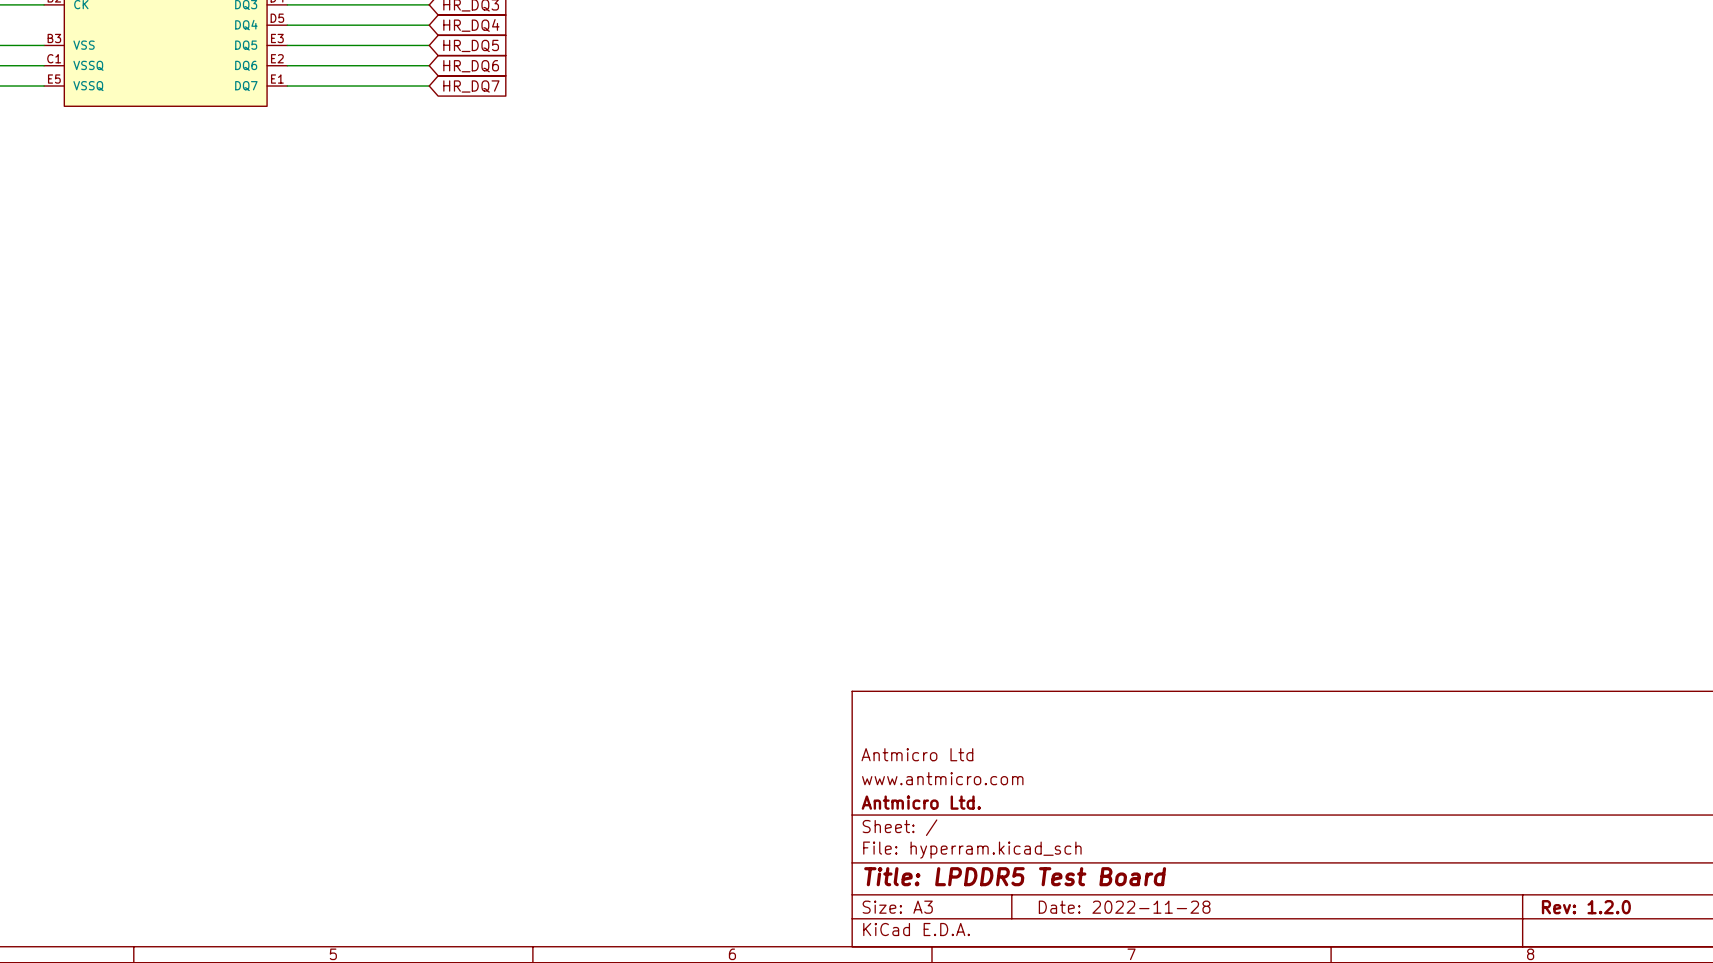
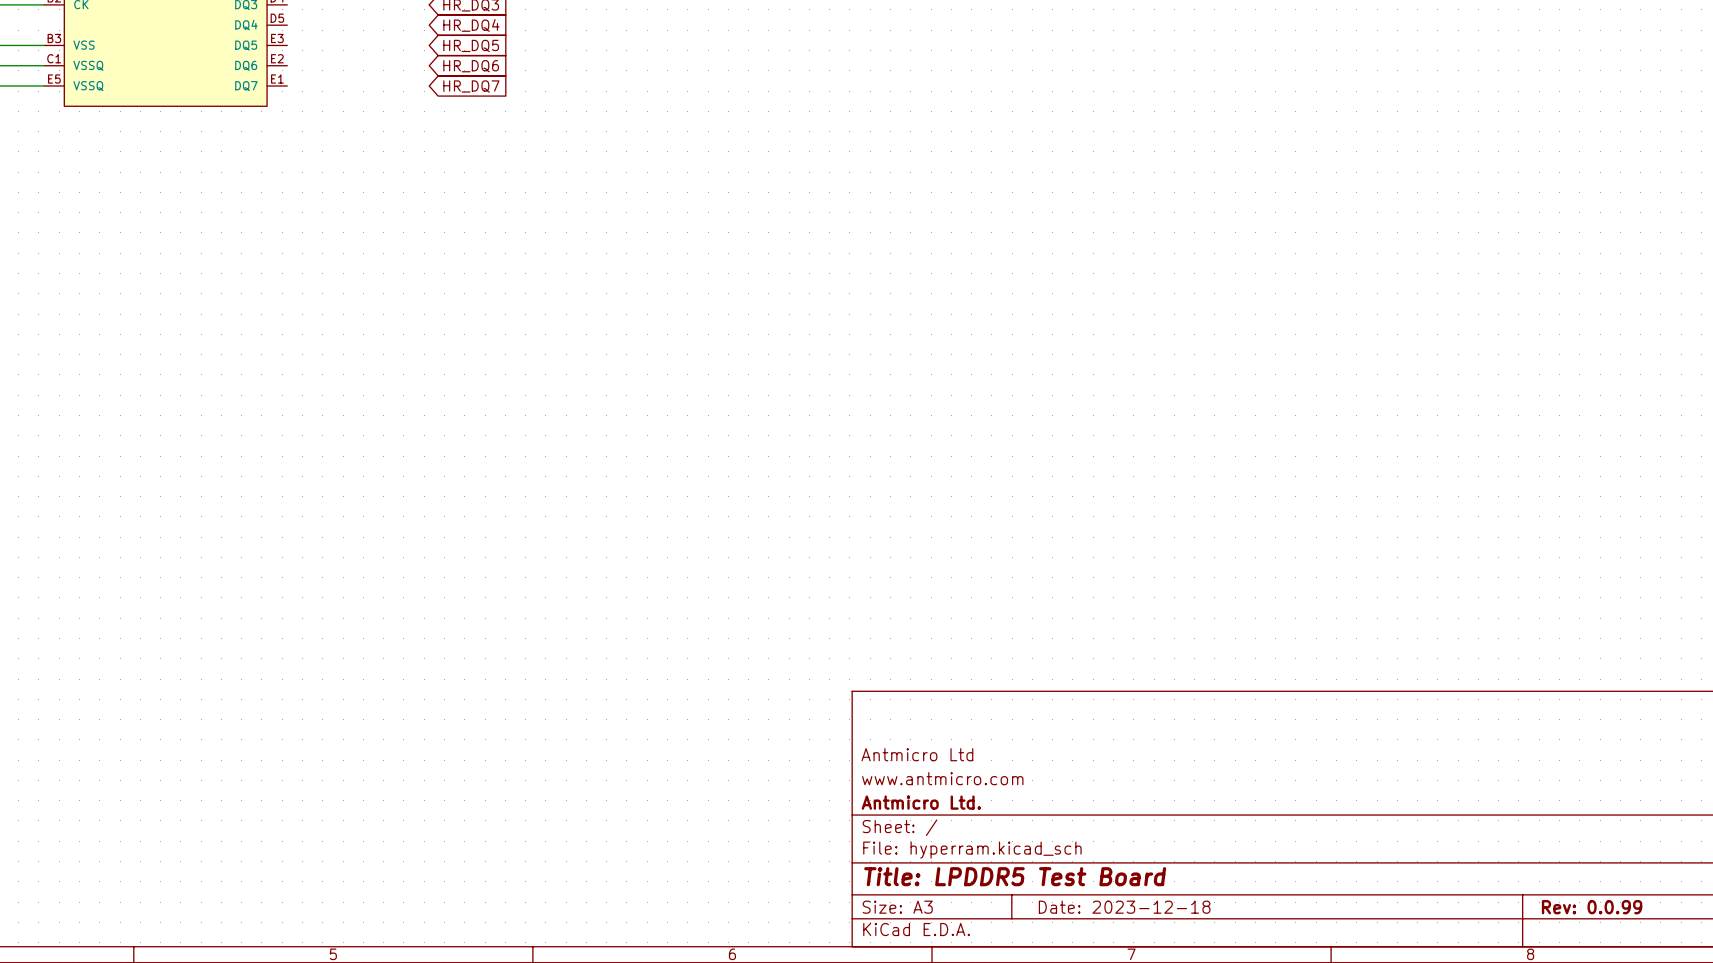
wire: (287, 4) (429, 4) -> none
wire: (287, 25) (429, 25) -> none
wire: (287, 45) (429, 45) -> none
wire: (287, 65) (429, 65) -> none
wire: (287, 86) (429, 86) -> none
title block: Date: 2022-11-28 (1124, 907) -> Date: 2023-12-18 (1124, 907)
title block: Rev: 1.2.0 (1586, 907) -> Rev: 0.0.99 (1592, 907)

